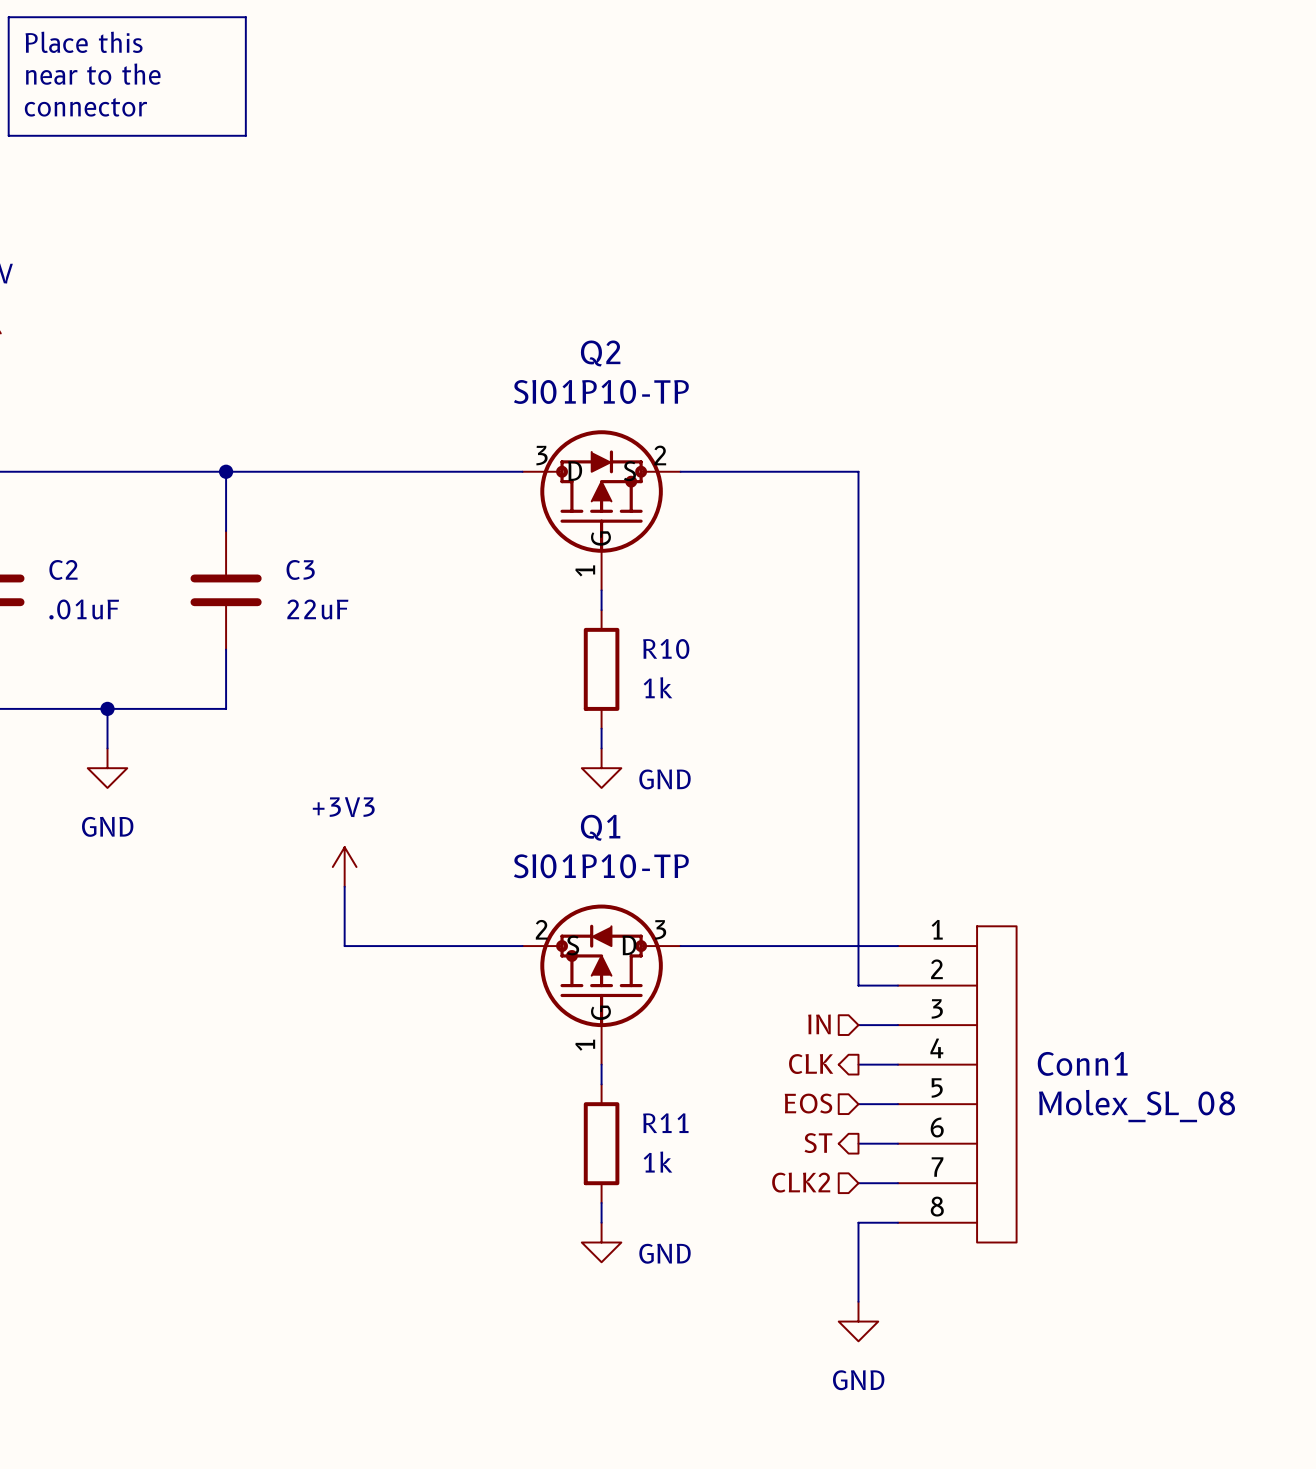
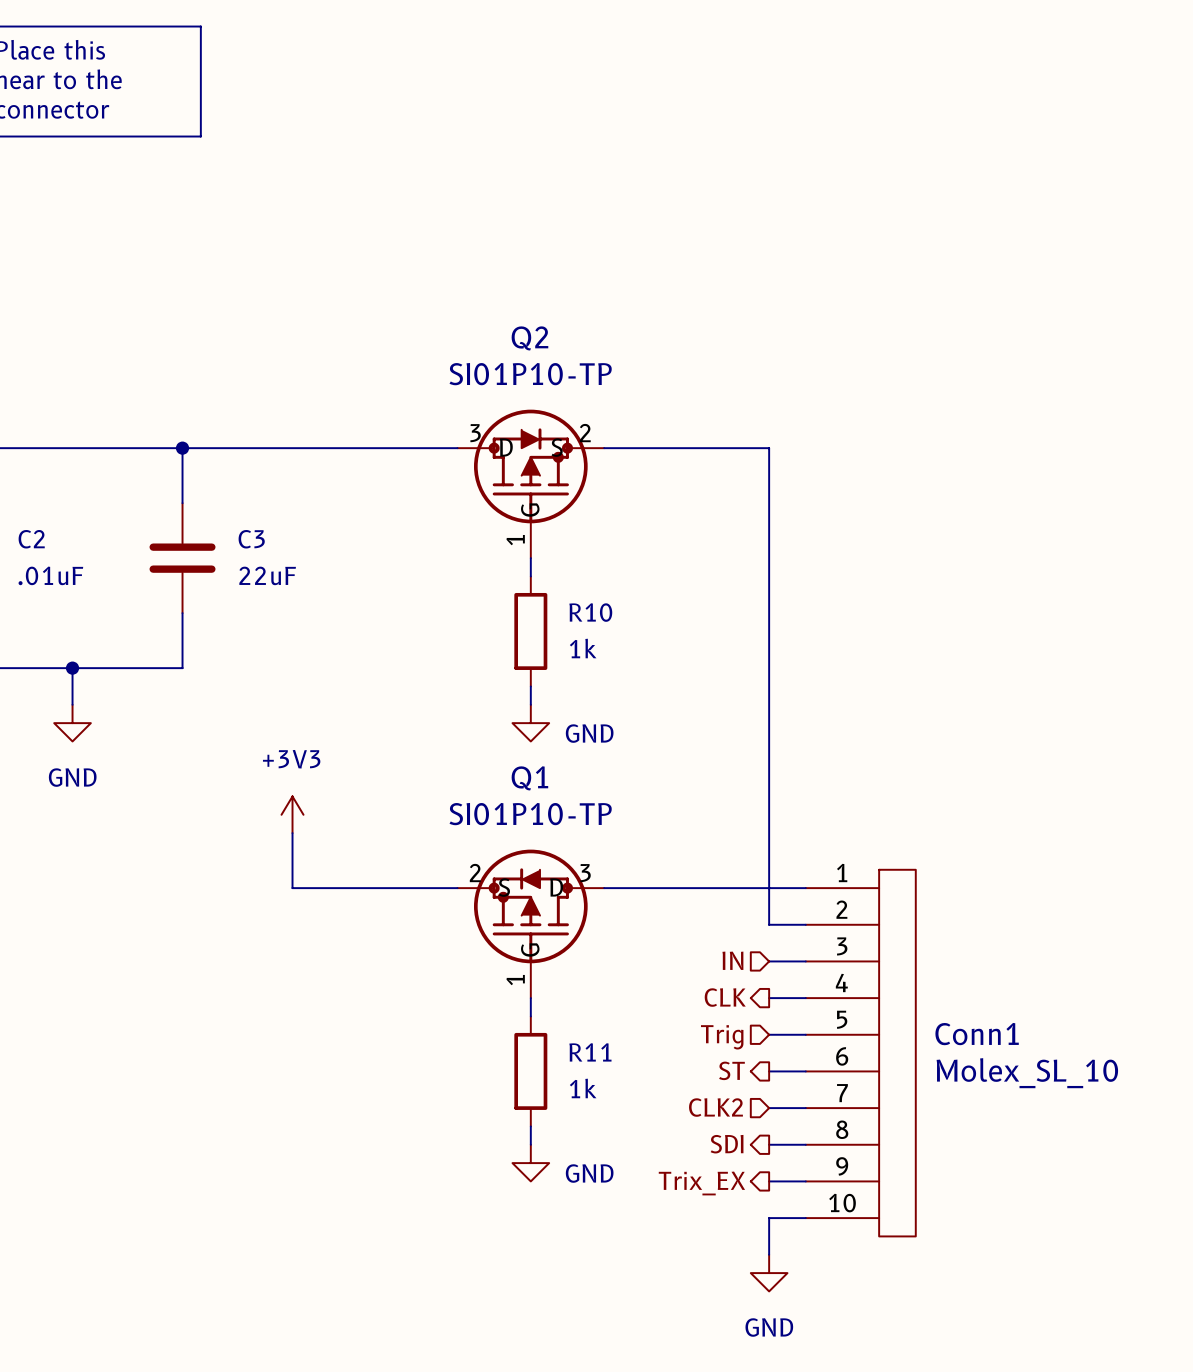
Conn1 symbol: [898, 926, 1017, 1243] -> [805, 869, 916, 1237]
hierarchical label: EOS (808, 1103) -> Trig (722, 1037)
Conn1 value: Molex_SL_08 (1137, 1106) -> Molex_SL_10 (1027, 1073)
hierarchical label: none -> SDI (727, 1144)
wire: (858, 1222) (858, 1301) -> none
wire: none -> (769, 1181) (805, 1181)
hierarchical label: none -> Trix_EX (701, 1183)
wire: none -> (805, 1218) (769, 1218) (769, 1254)
power symbol position: GND (858, 1321) -> GND (769, 1273)

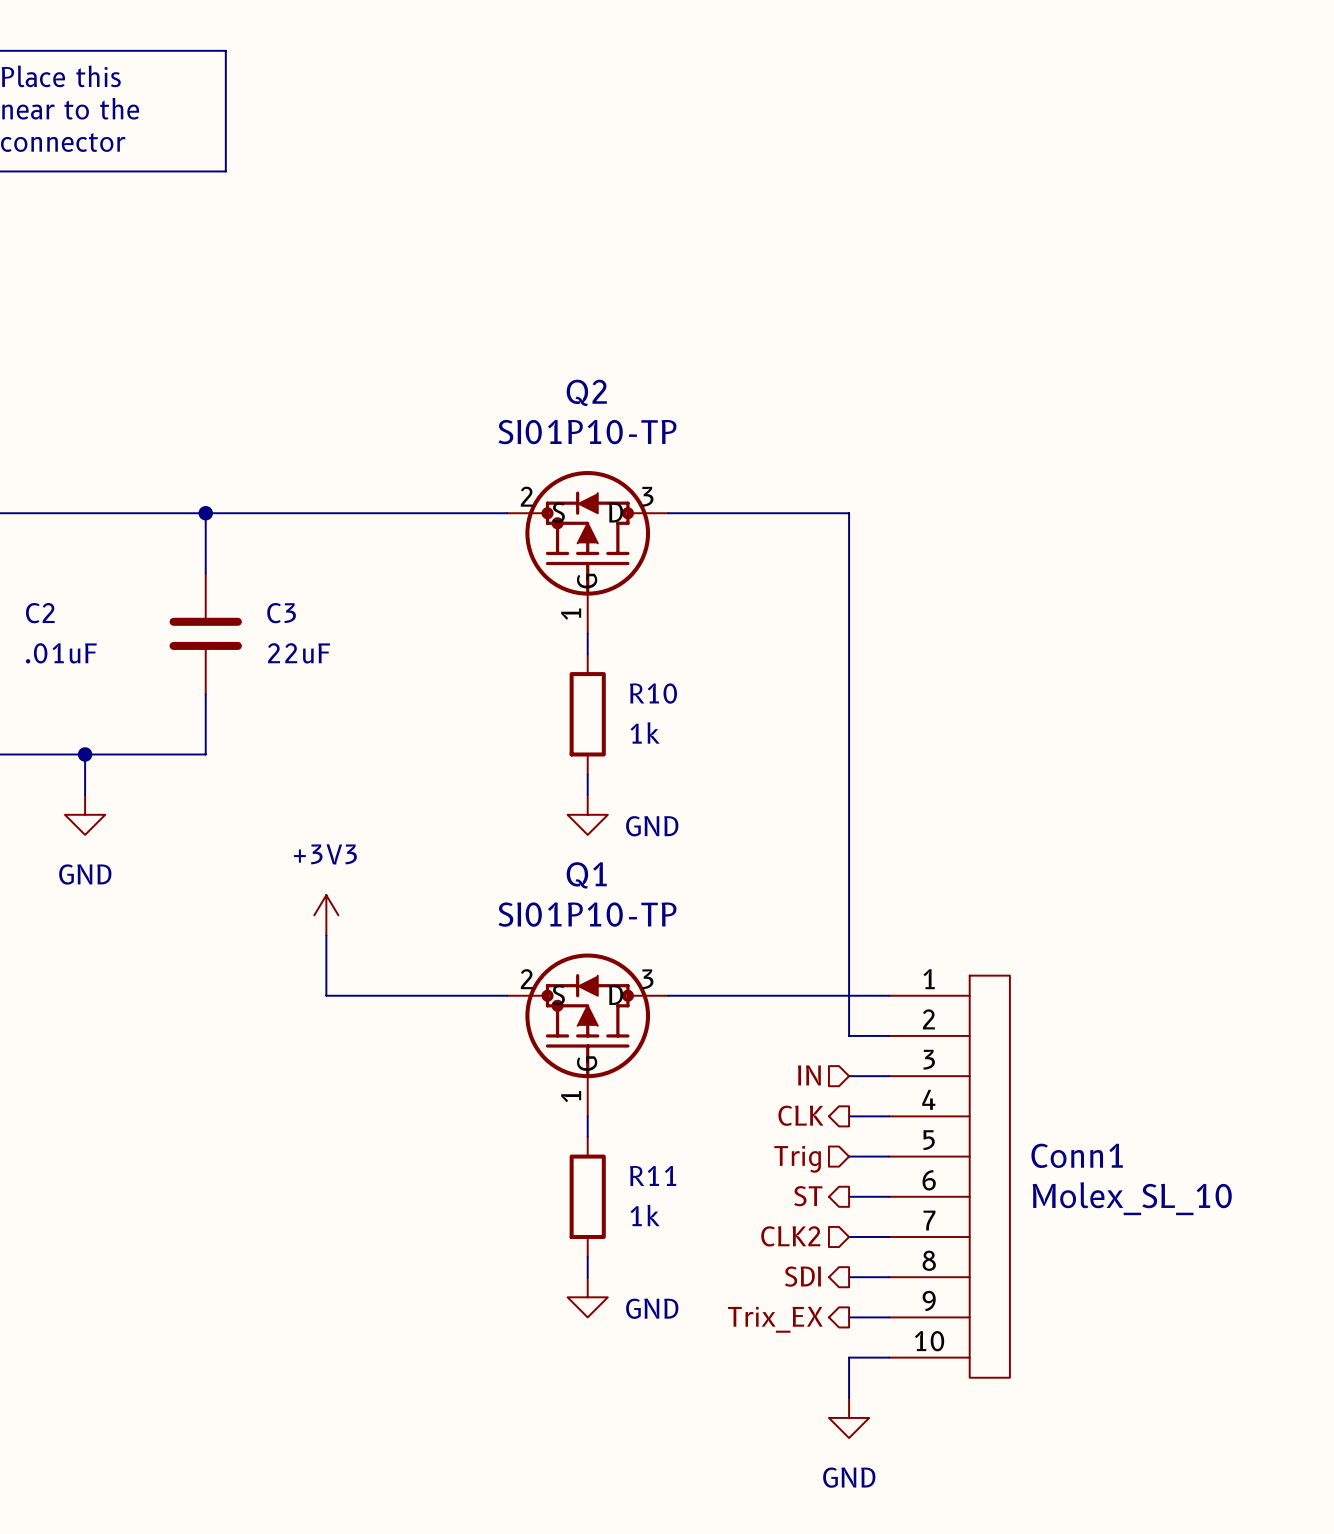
Q2 flip: as is (530, 466) -> left-right (587, 533)

